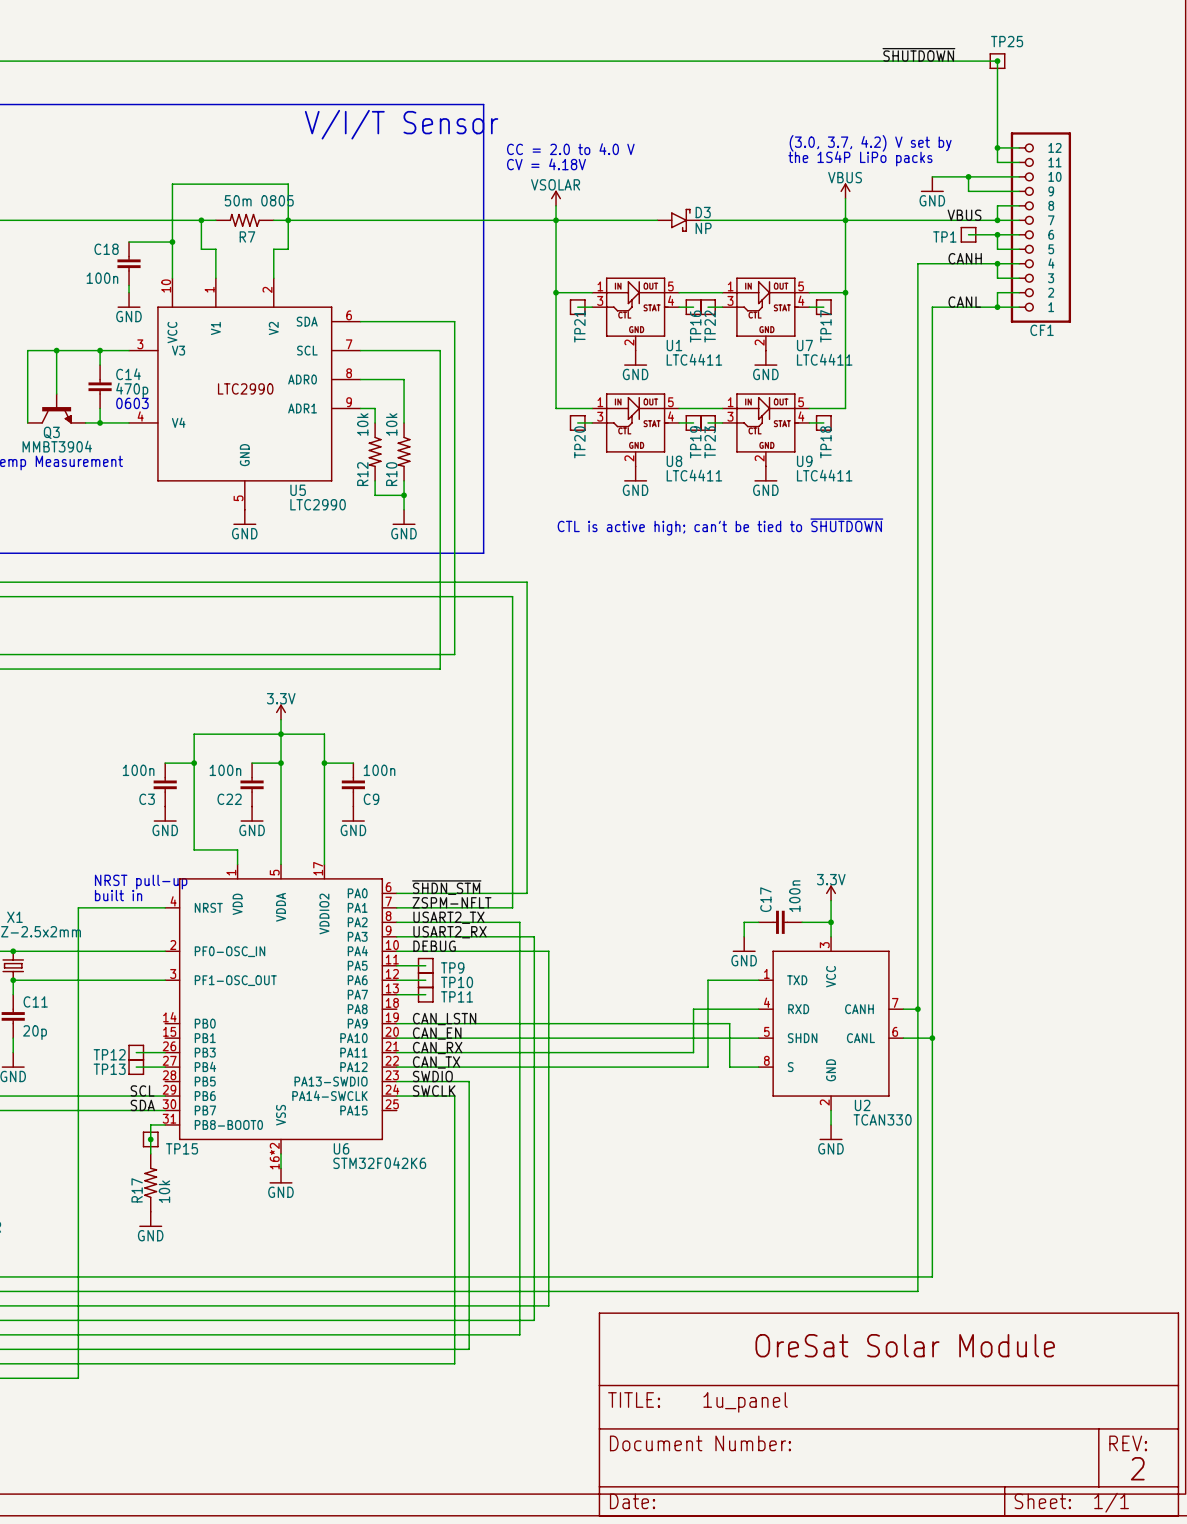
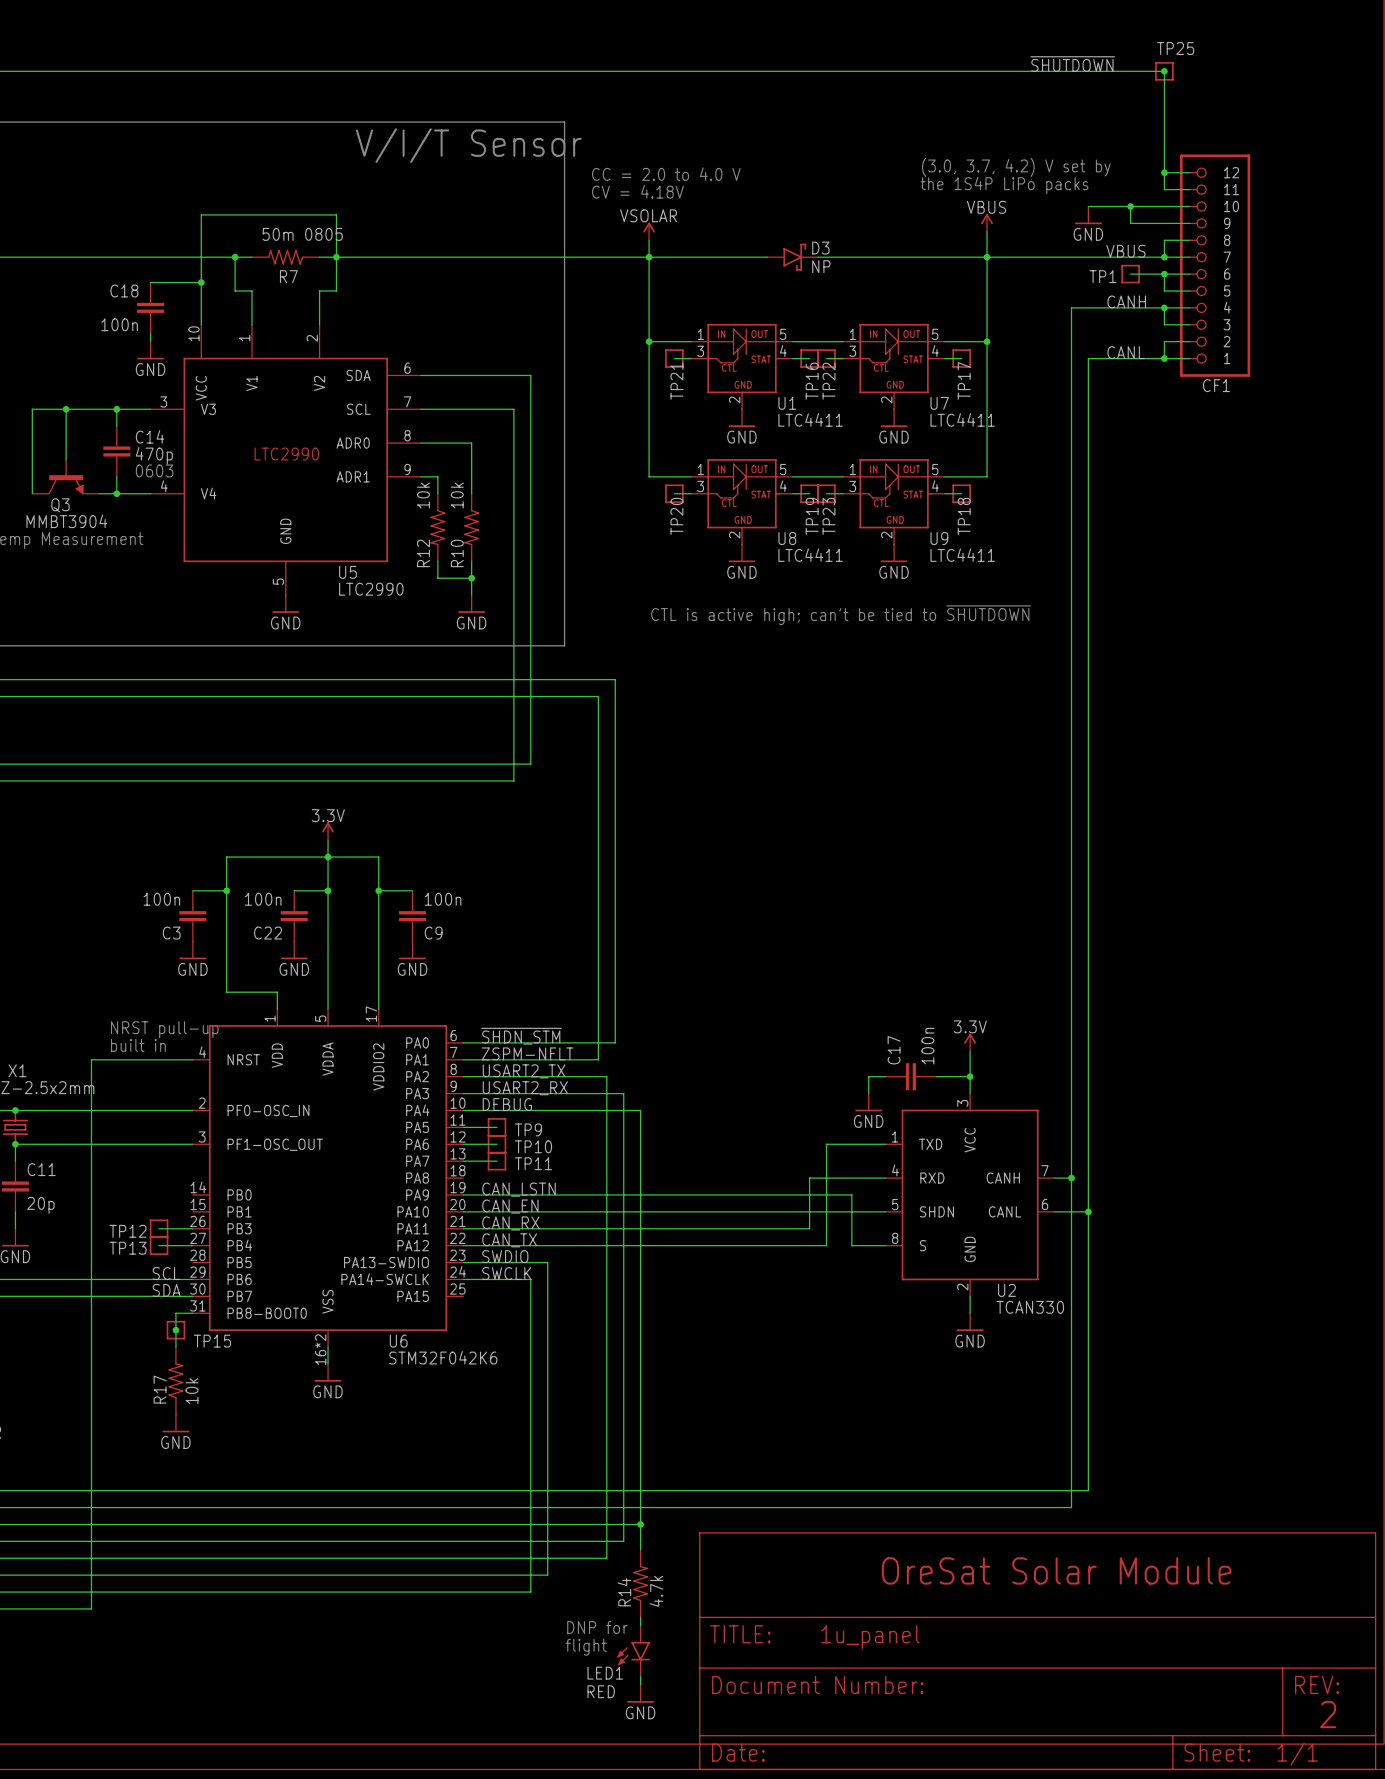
wire: none -> (640, 1524) (640, 1549)
junction: none -> (640, 1524)
R14: none -> 4.7k (640, 1583)
wire: none -> (640, 1617) (640, 1625)
text: none -> DNP for (597, 1627)
text: none -> flight (586, 1647)
LED1: none -> RED (633, 1651)
wire: none -> (640, 1676) (640, 1684)
power symbol: none -> GND (640, 1693)

